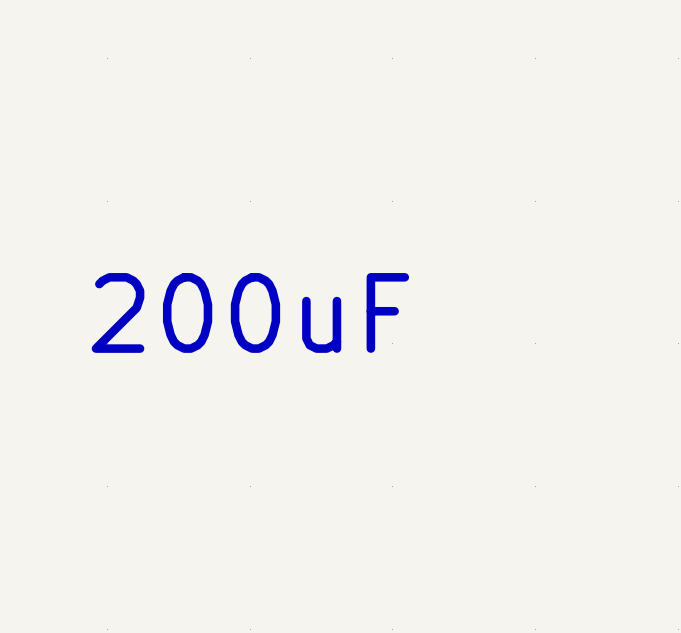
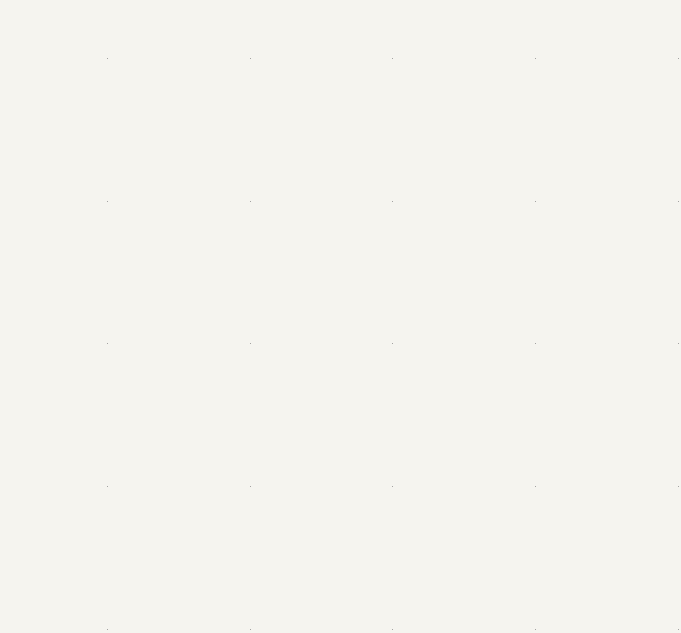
text: 200uF (250, 312) -> none

